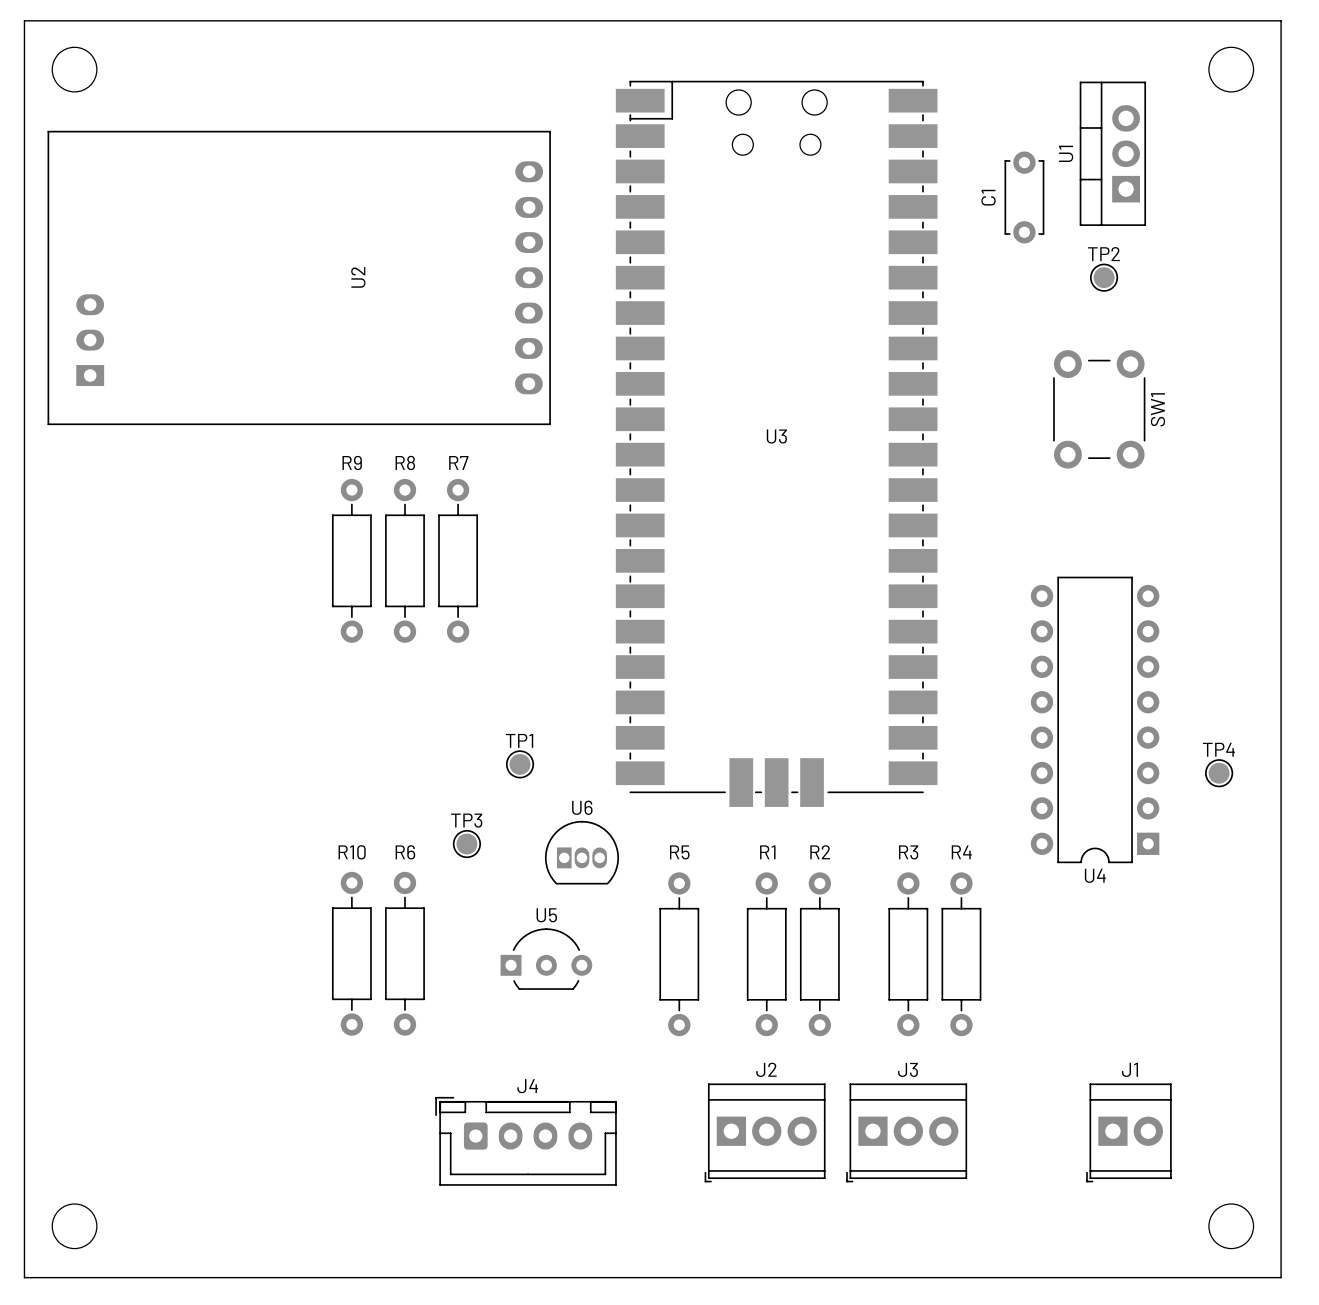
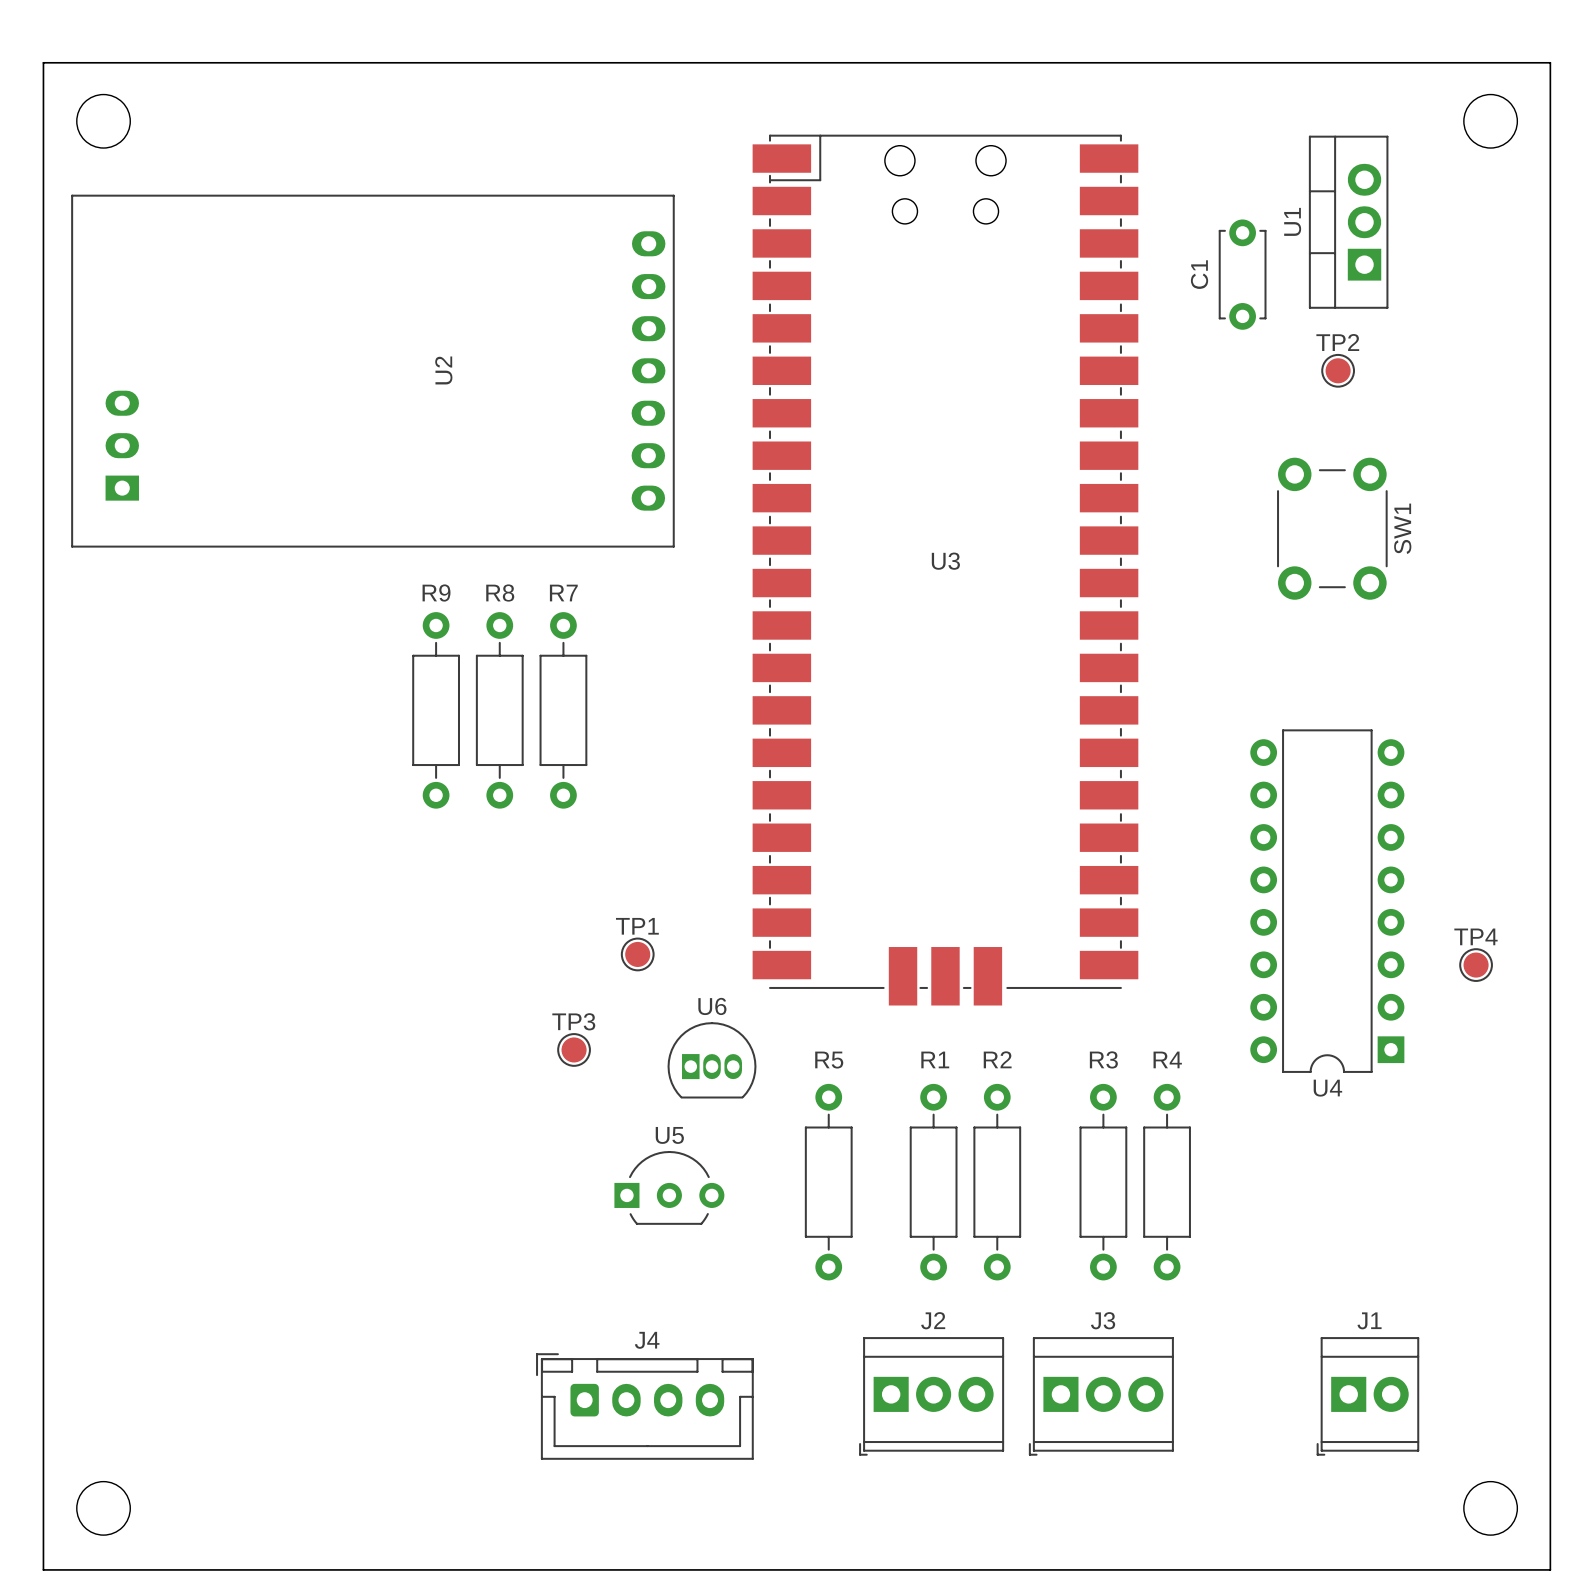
R10: (351, 953) -> none
R6: (404, 953) -> none

